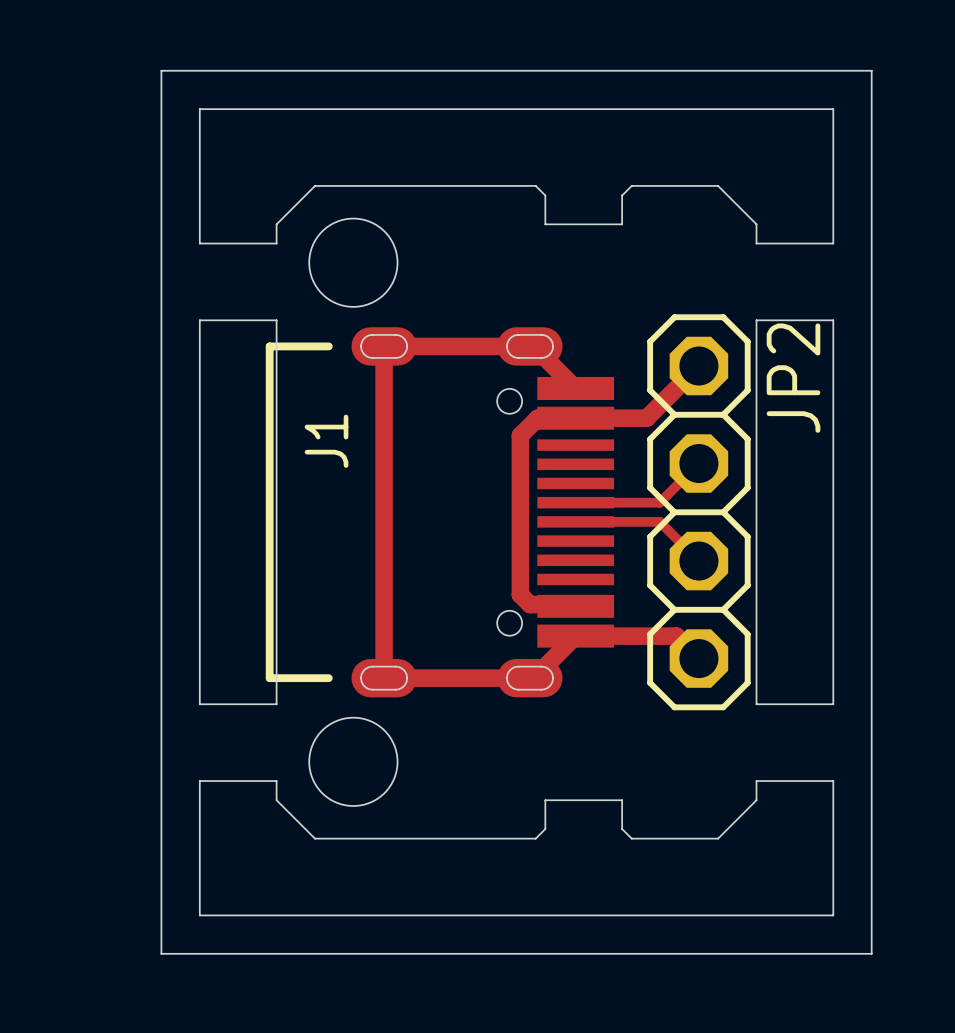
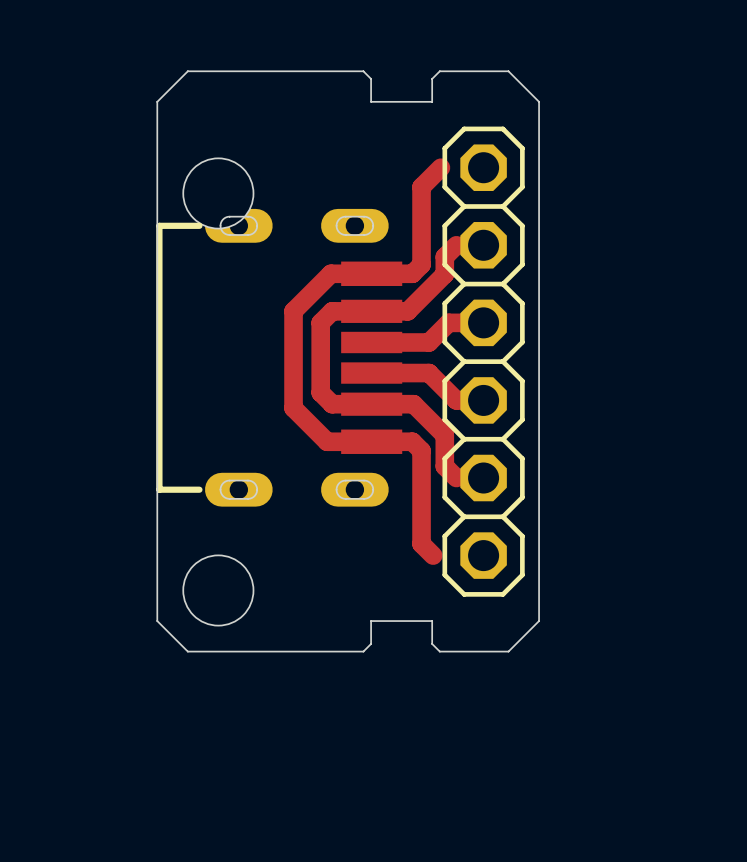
board edge: (161, 70) (871, 70) (871, 953) (161, 953) (161, 70) -> none
board edge: (314, 109) (199, 109) (199, 243) (276, 243) -> (187, 71) (157, 101) (157, 162)
board edge: (535, 109) (631, 109) -> (363, 71) (371, 78) (371, 101) (432, 101) (432, 78) (439, 71)
board edge: (718, 109) (833, 109) (833, 243) (756, 243) -> (508, 71) (539, 101) (539, 162)
board edge: (276, 224) (314, 185) (535, 185) (545, 195) (545, 224) (622, 224) (622, 195) (631, 185) (718, 185) (756, 224) -> none
track: none -> (440, 167) (421, 187) (421, 264) (412, 273) (330, 273) (293, 311) (293, 408) (327, 441) (412, 441) (421, 450) (421, 543) (433, 555)
board edge: (276, 320) (199, 320) (199, 704) (276, 704) -> (157, 239) (157, 178)
board edge: (756, 320) (833, 320) (833, 704) (756, 704) -> (539, 239) (539, 178)
track: none -> (456, 245) (444, 256) (444, 274) (407, 311) (332, 311) (320, 322) (320, 392) (332, 404) (413, 404) (444, 435) (444, 466) (456, 478)
track: (698, 366) (646, 418) (537, 418) (520, 435) (520, 594) (530, 604) (573, 604) (575, 606) -> none
track: (575, 388) (533, 346) (384, 346) (384, 678) (533, 678) (575, 636) (676, 636) (698, 658) -> none
track: none -> (483, 322) (448, 322) (429, 342) (371, 342)
track: (698, 463) (659, 502) (575, 502) -> none
part: none -> (279, 357)
part: none -> (483, 361)
track: none -> (371, 373) (429, 373) (456, 400) (483, 400)
J1: (439, 512) -> none
JP2: (698, 512) -> none
track: (575, 521) (659, 521) (698, 561) -> none
board edge: none -> (539, 544) (539, 605)
board edge: (276, 781) (199, 781) (199, 915) (833, 915) (833, 781) (756, 781) -> (157, 605) (157, 544)

